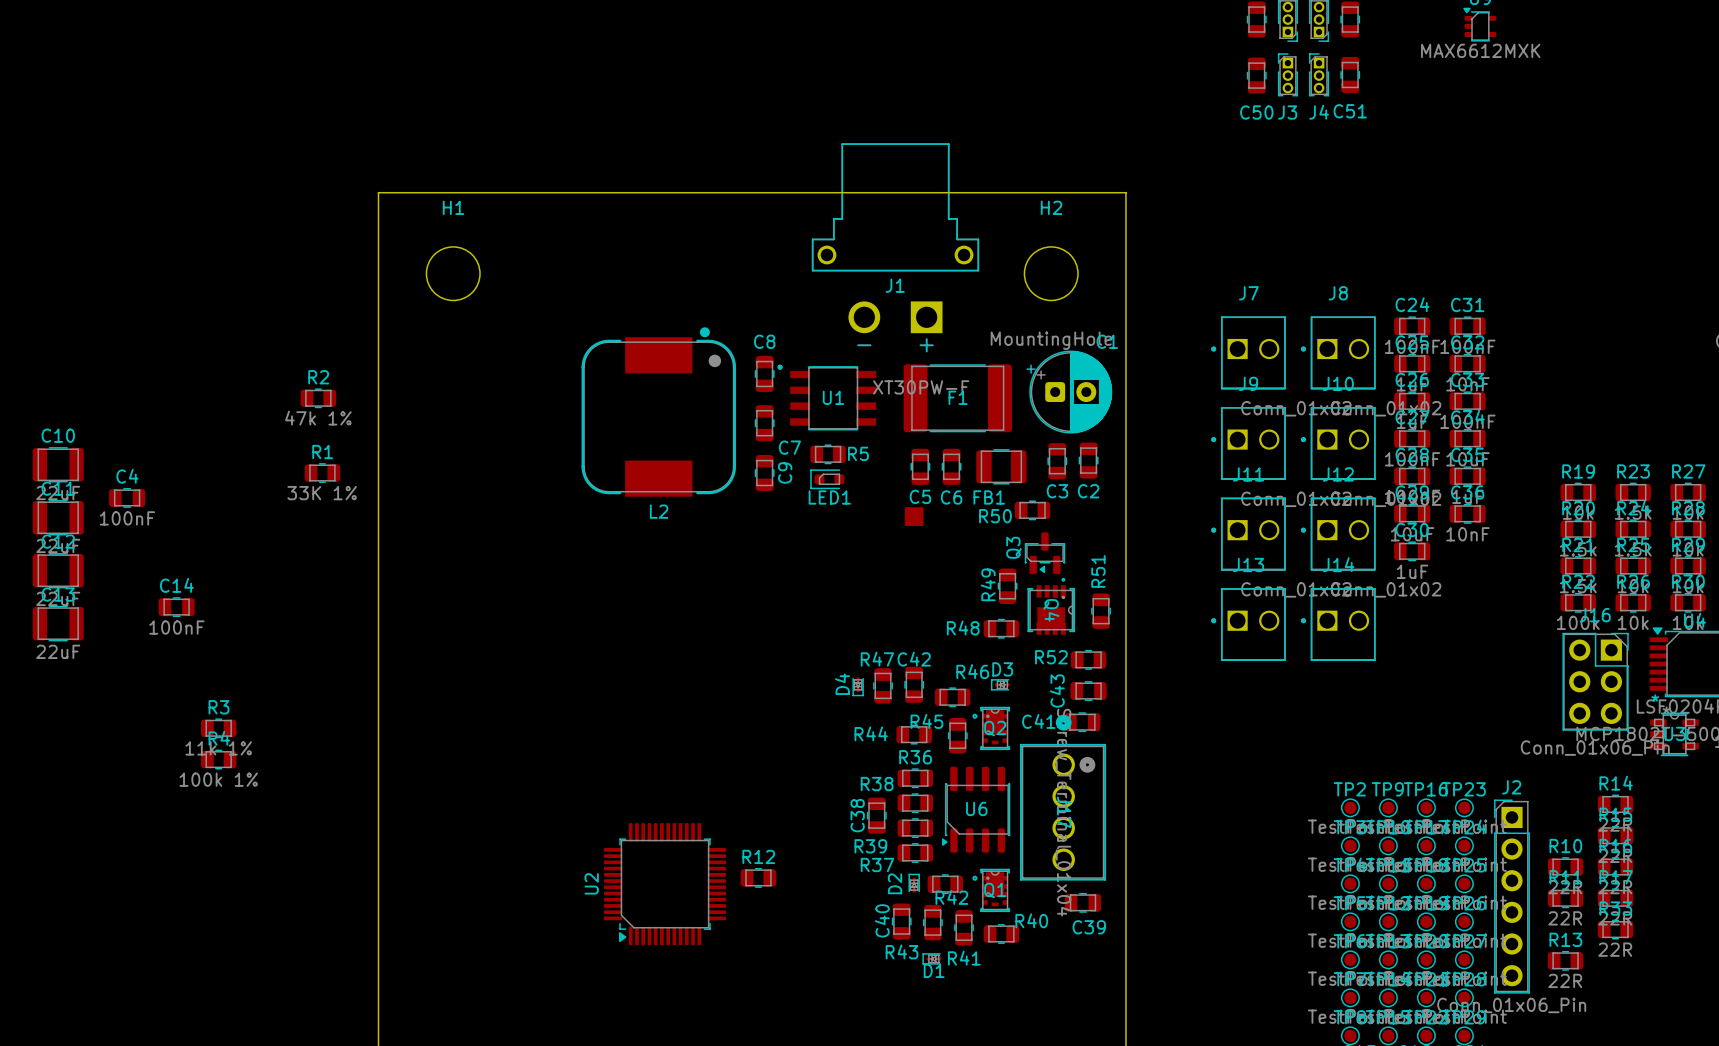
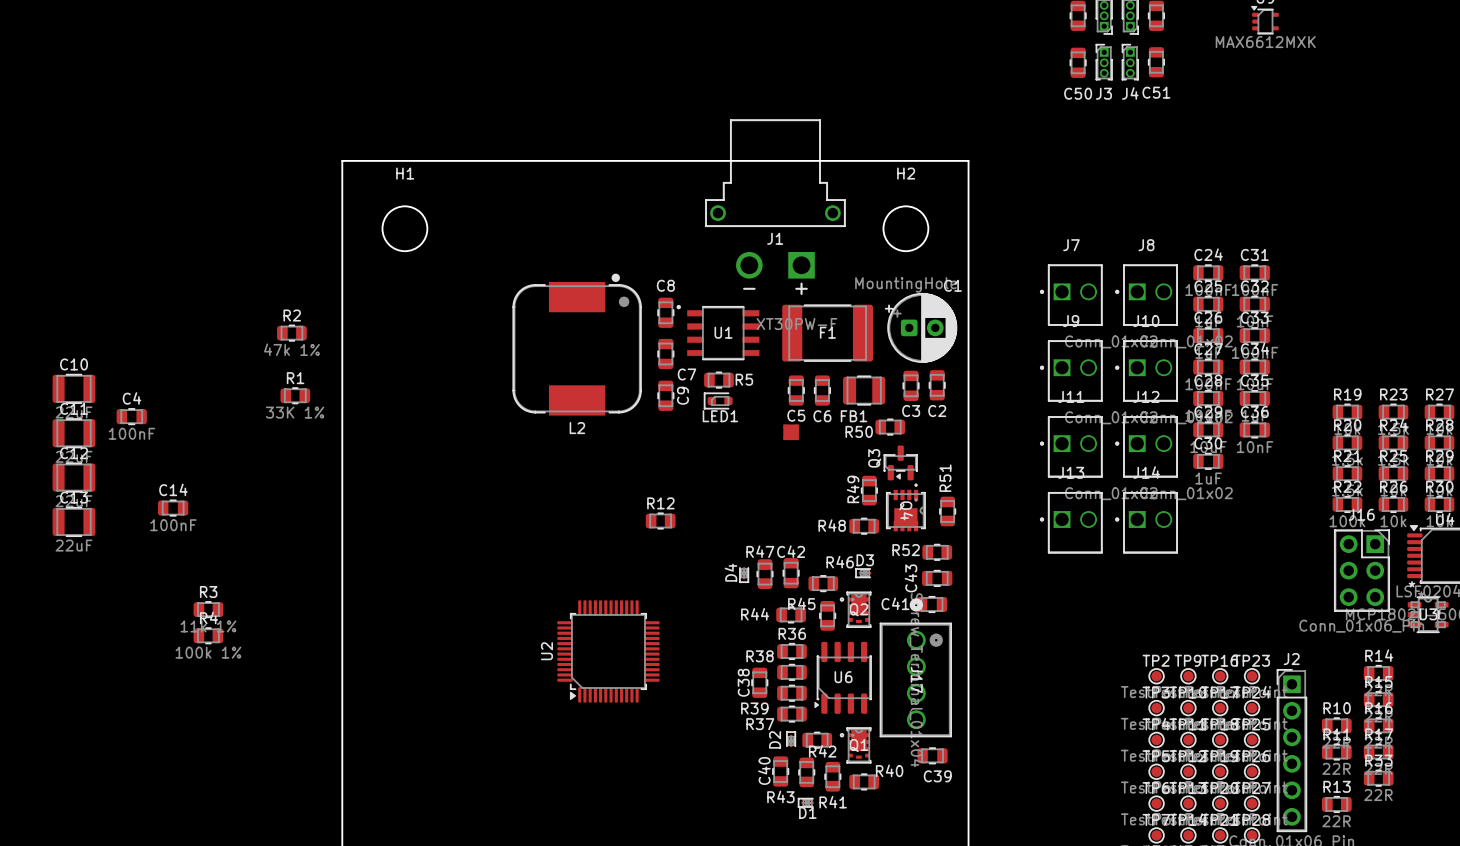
R12 position: (758, 877) -> (660, 521)
U2 position: (665, 884) -> (608, 651)

